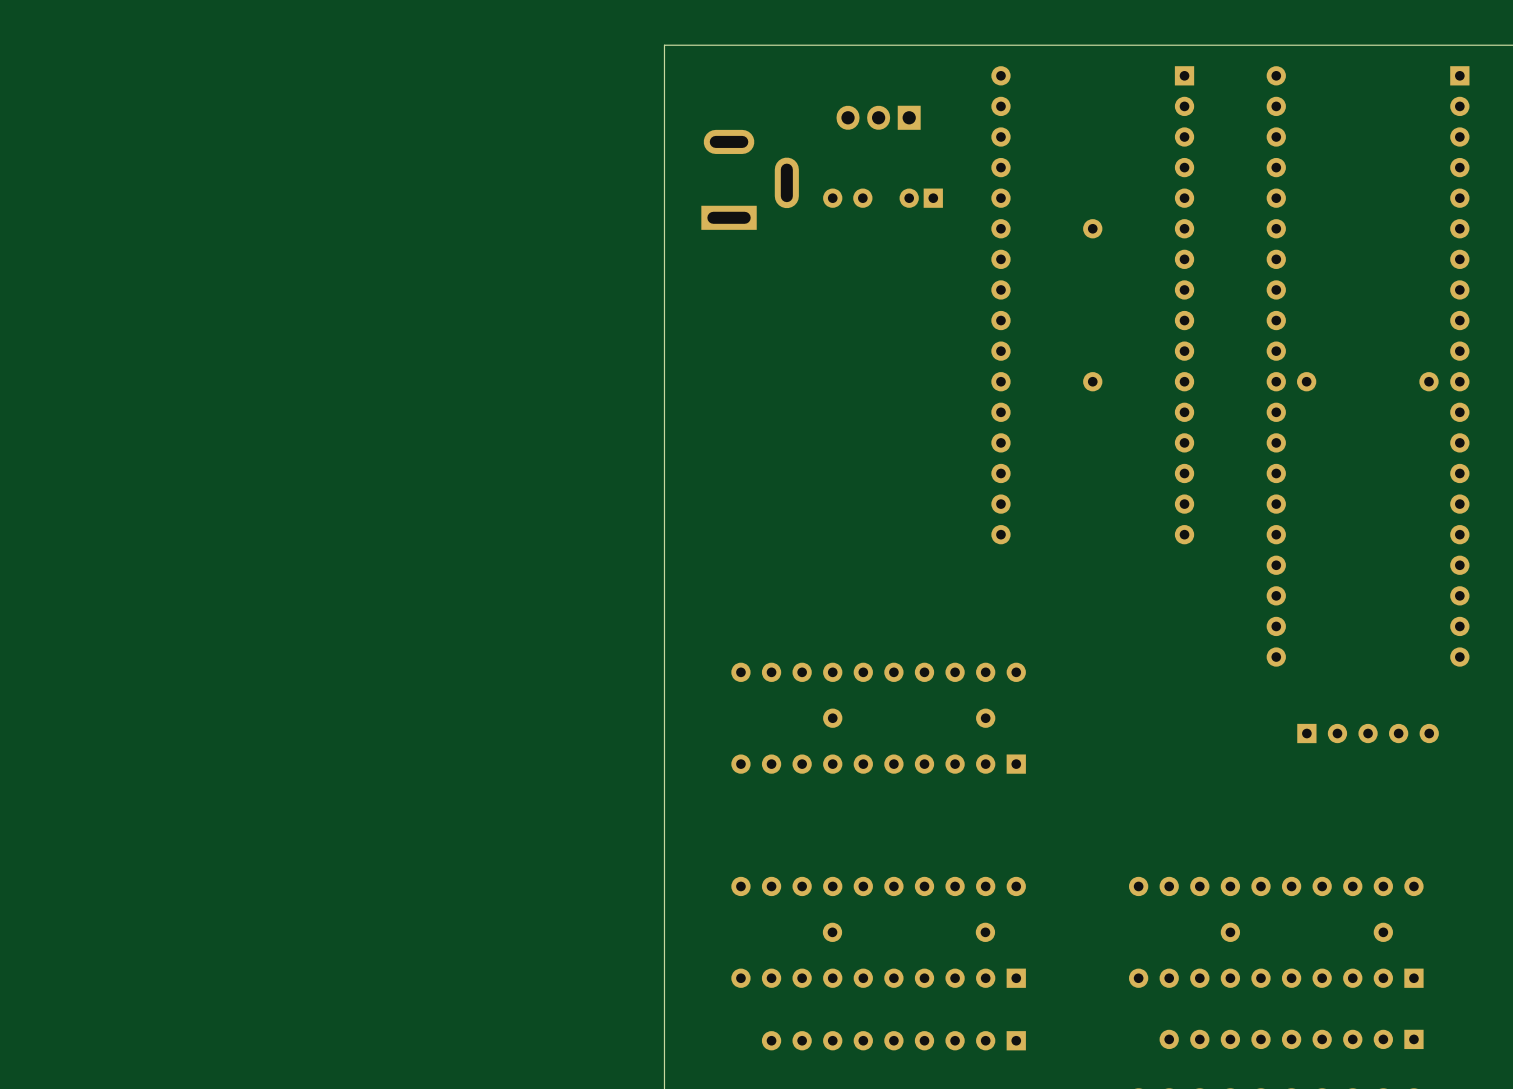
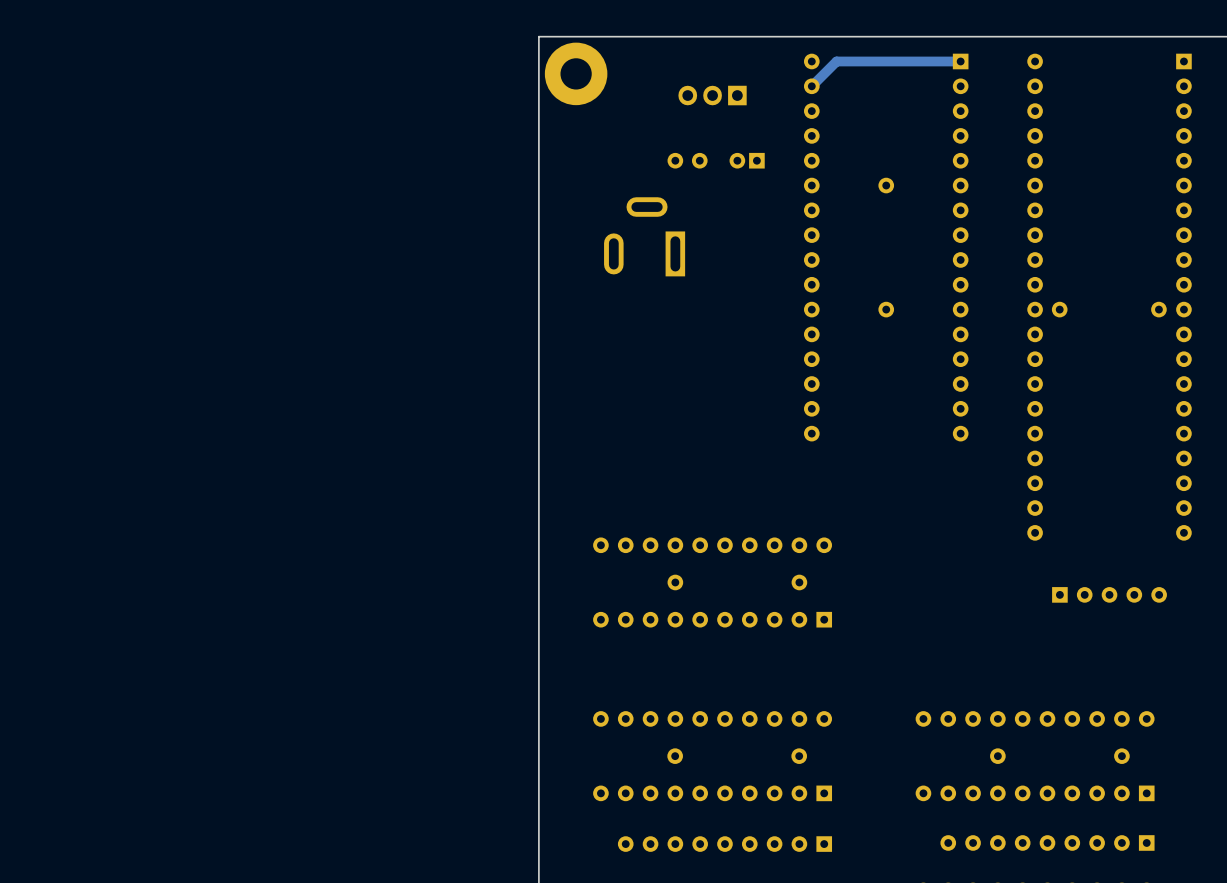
track: none -> (960, 61) (836, 61) (811, 86)
part: none -> (576, 73)
part rotation: 0° (750, 179) -> 90° counterclockwise (644, 236)
part position: (750, 179) -> (644, 236)

